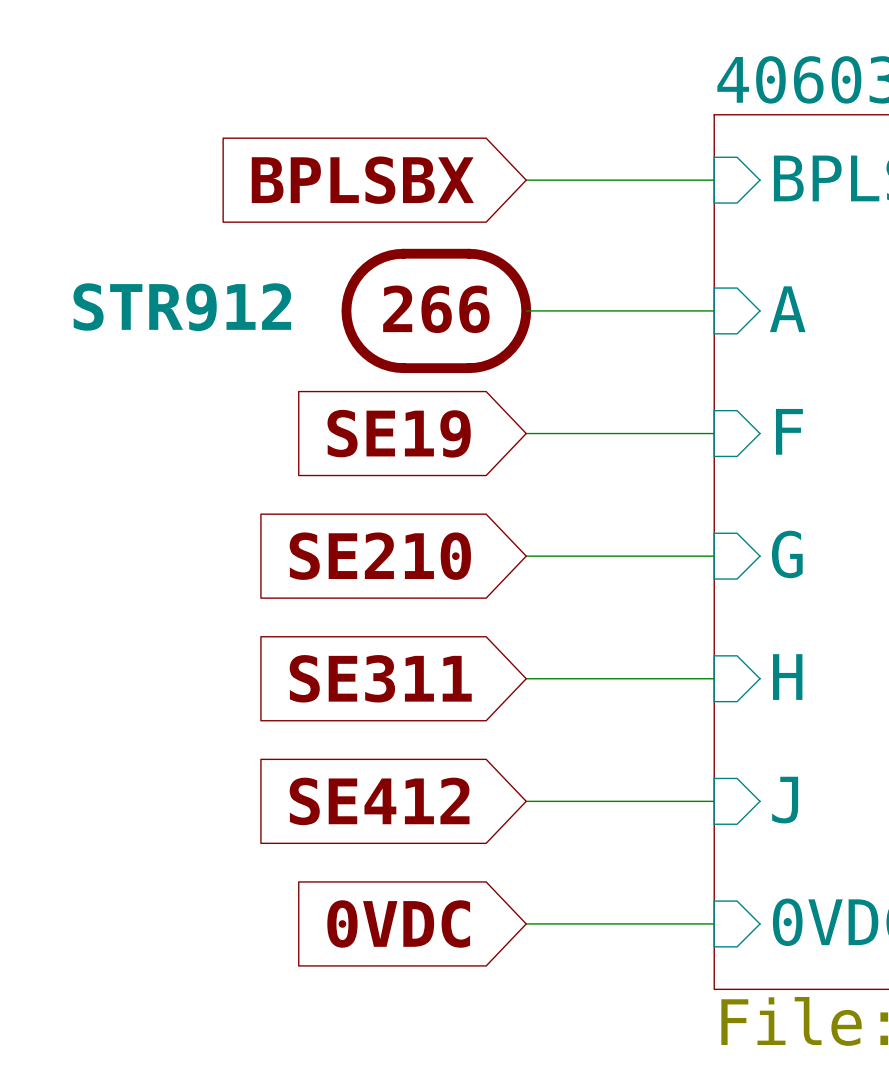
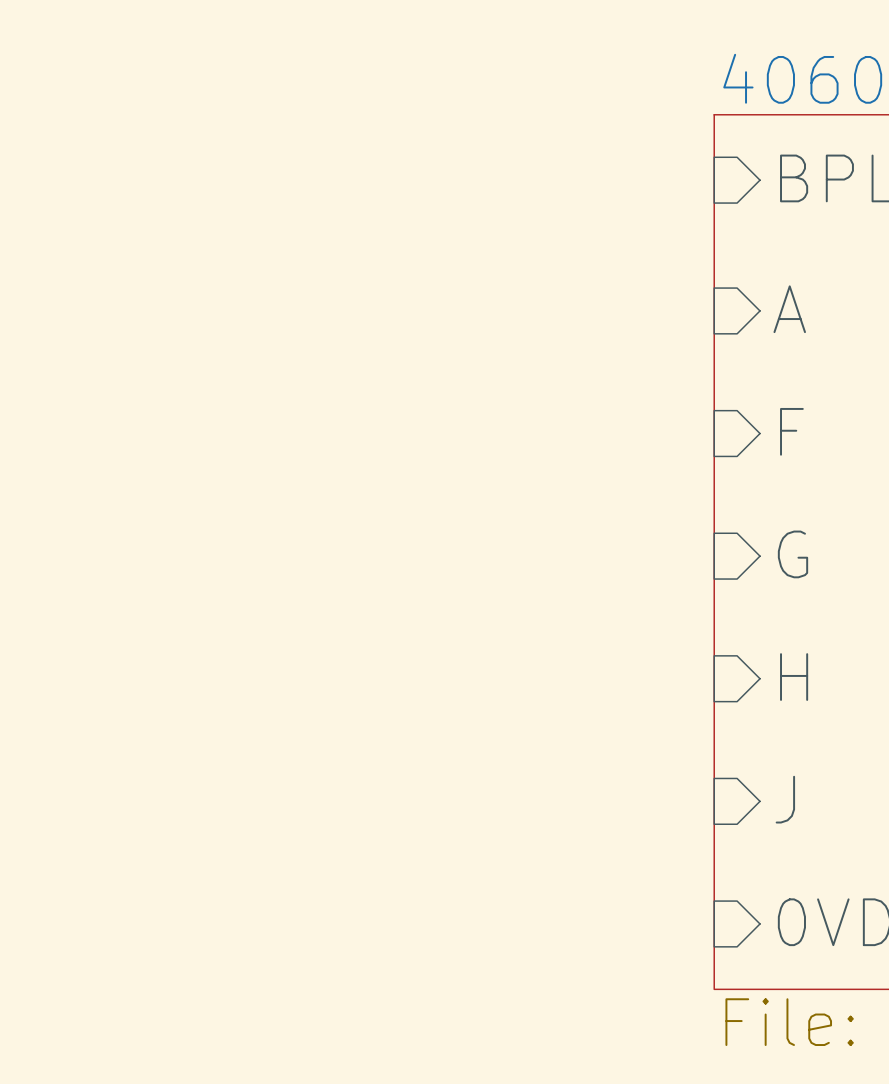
global label: BPLSBX (362, 180) -> none
wire: (526, 180) (714, 180) -> none
part: (436, 310) -> none
wire: (526, 310) (714, 310) -> none
global label: SE19 (399, 433) -> none
wire: (526, 433) (714, 433) -> none
global label: SE210 (380, 556) -> none
wire: (526, 556) (714, 556) -> none
global label: SE311 (380, 678) -> none
wire: (526, 678) (714, 678) -> none
global label: SE412 (379, 801) -> none
wire: (526, 801) (714, 801) -> none
global label: 0VDC (398, 923) -> none
wire: (526, 923) (714, 923) -> none

